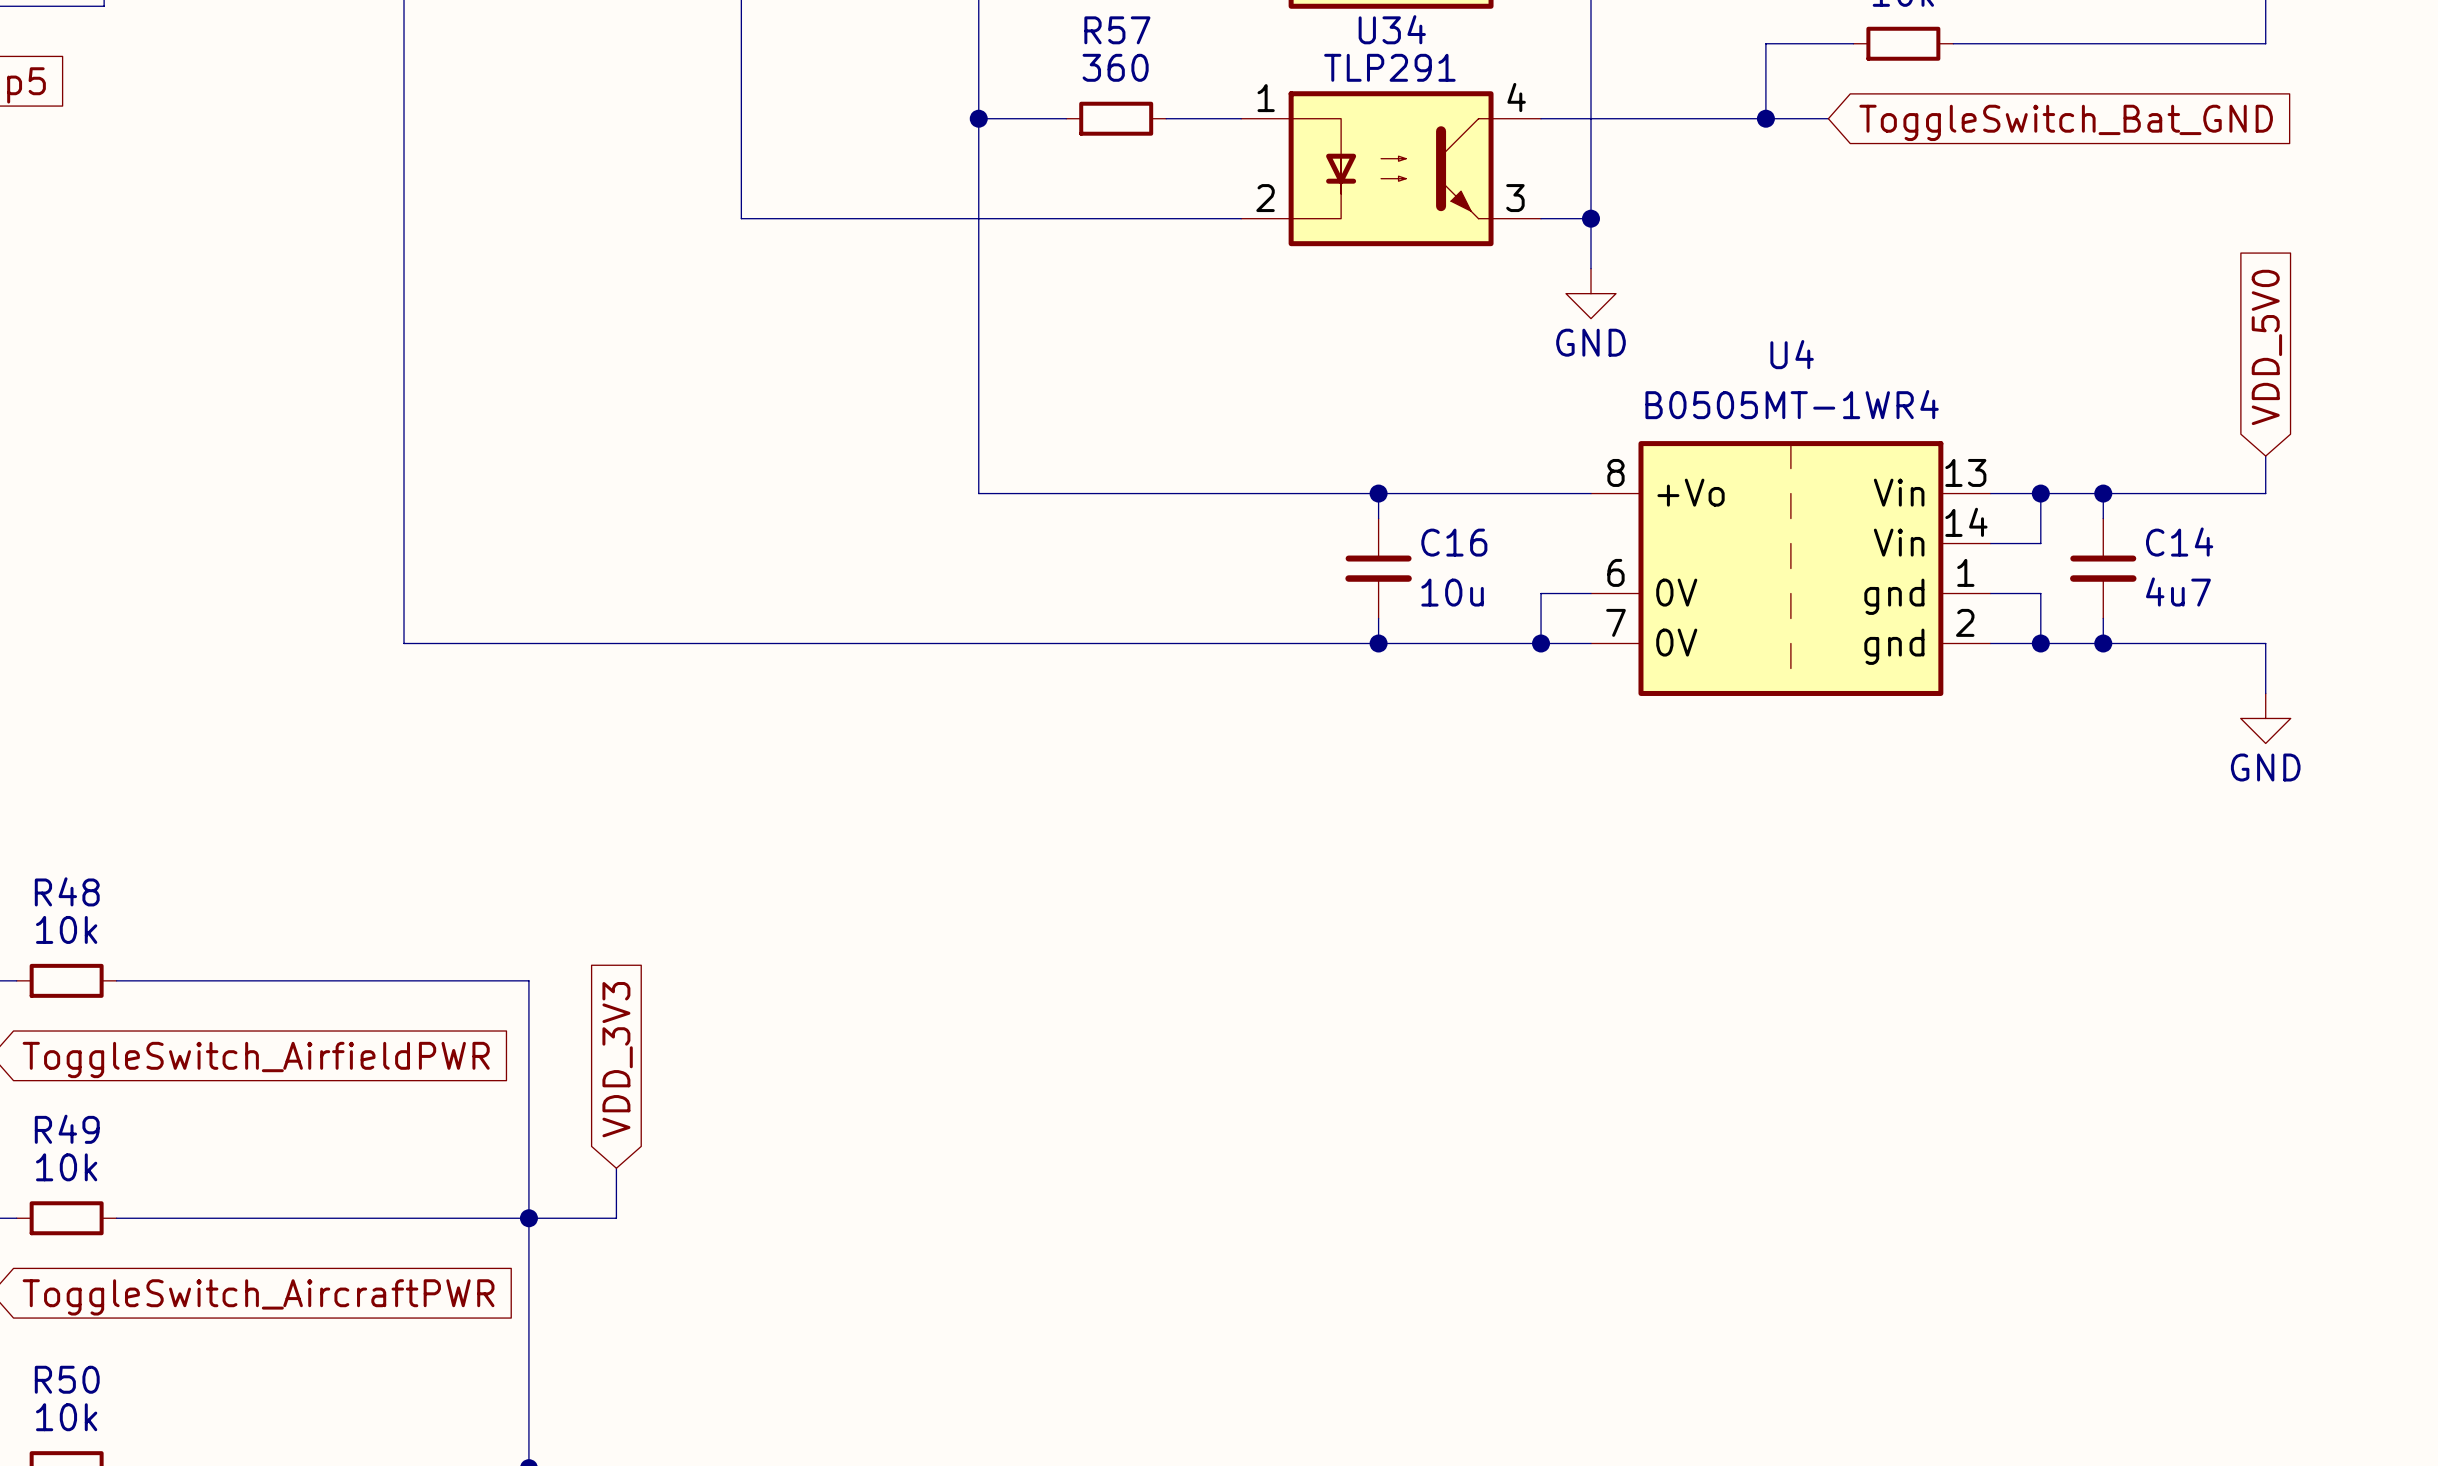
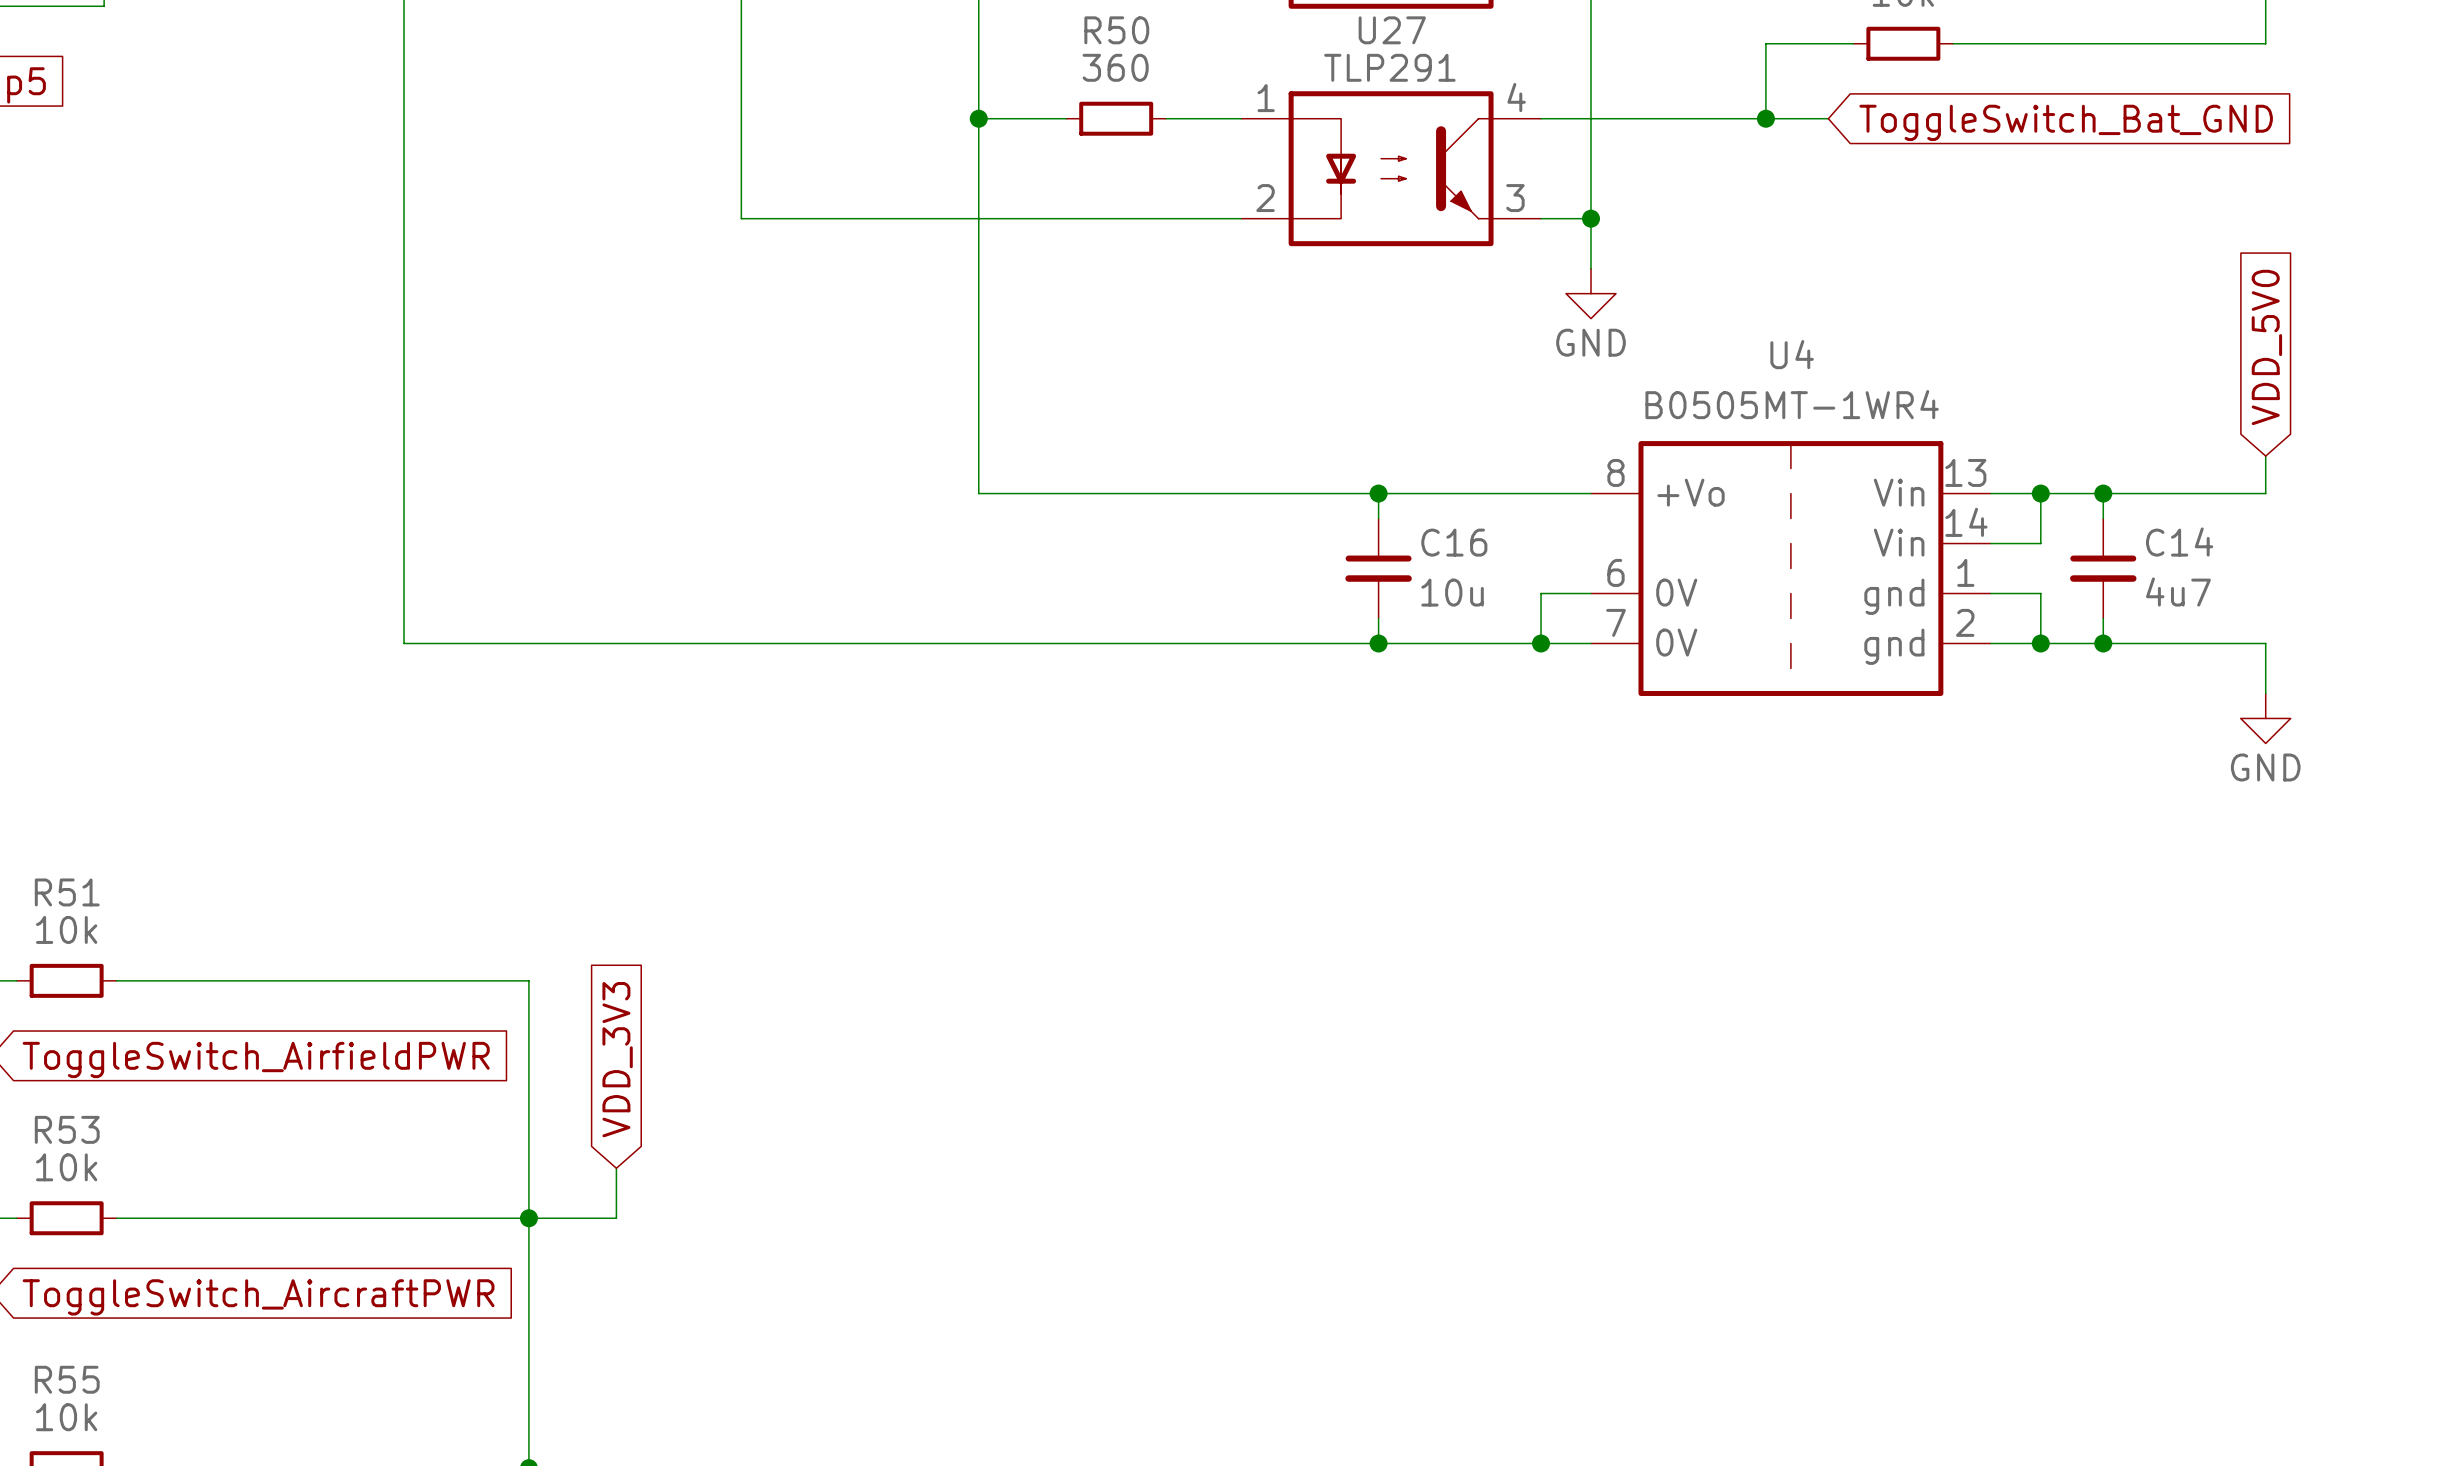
U34 name: U34 (1392, 29) -> U27 (1392, 30)
R57 name: R57 (1117, 30) -> R50 (1116, 30)
R48 name: R48 (67, 891) -> R51 (67, 892)
R49 name: R49 (67, 1129) -> R53 (67, 1129)
R50 name: R50 (67, 1379) -> R55 (67, 1379)

